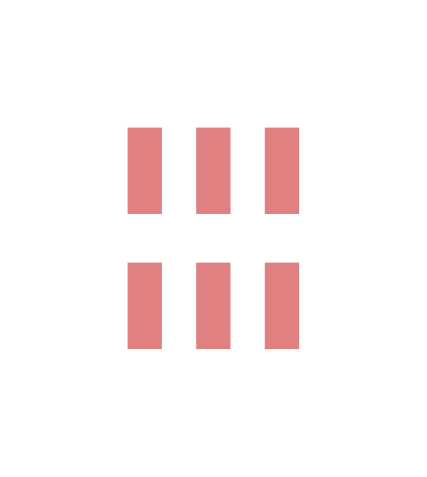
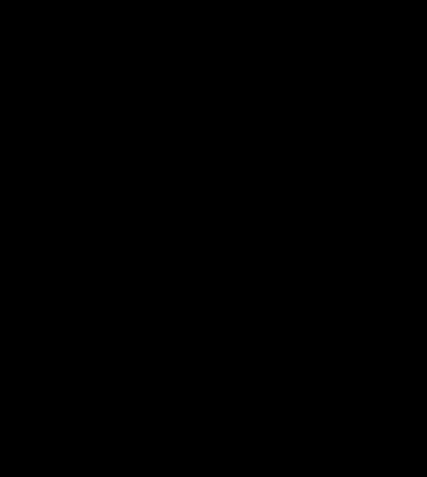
part: (213, 170) -> none
part: (213, 305) -> none

